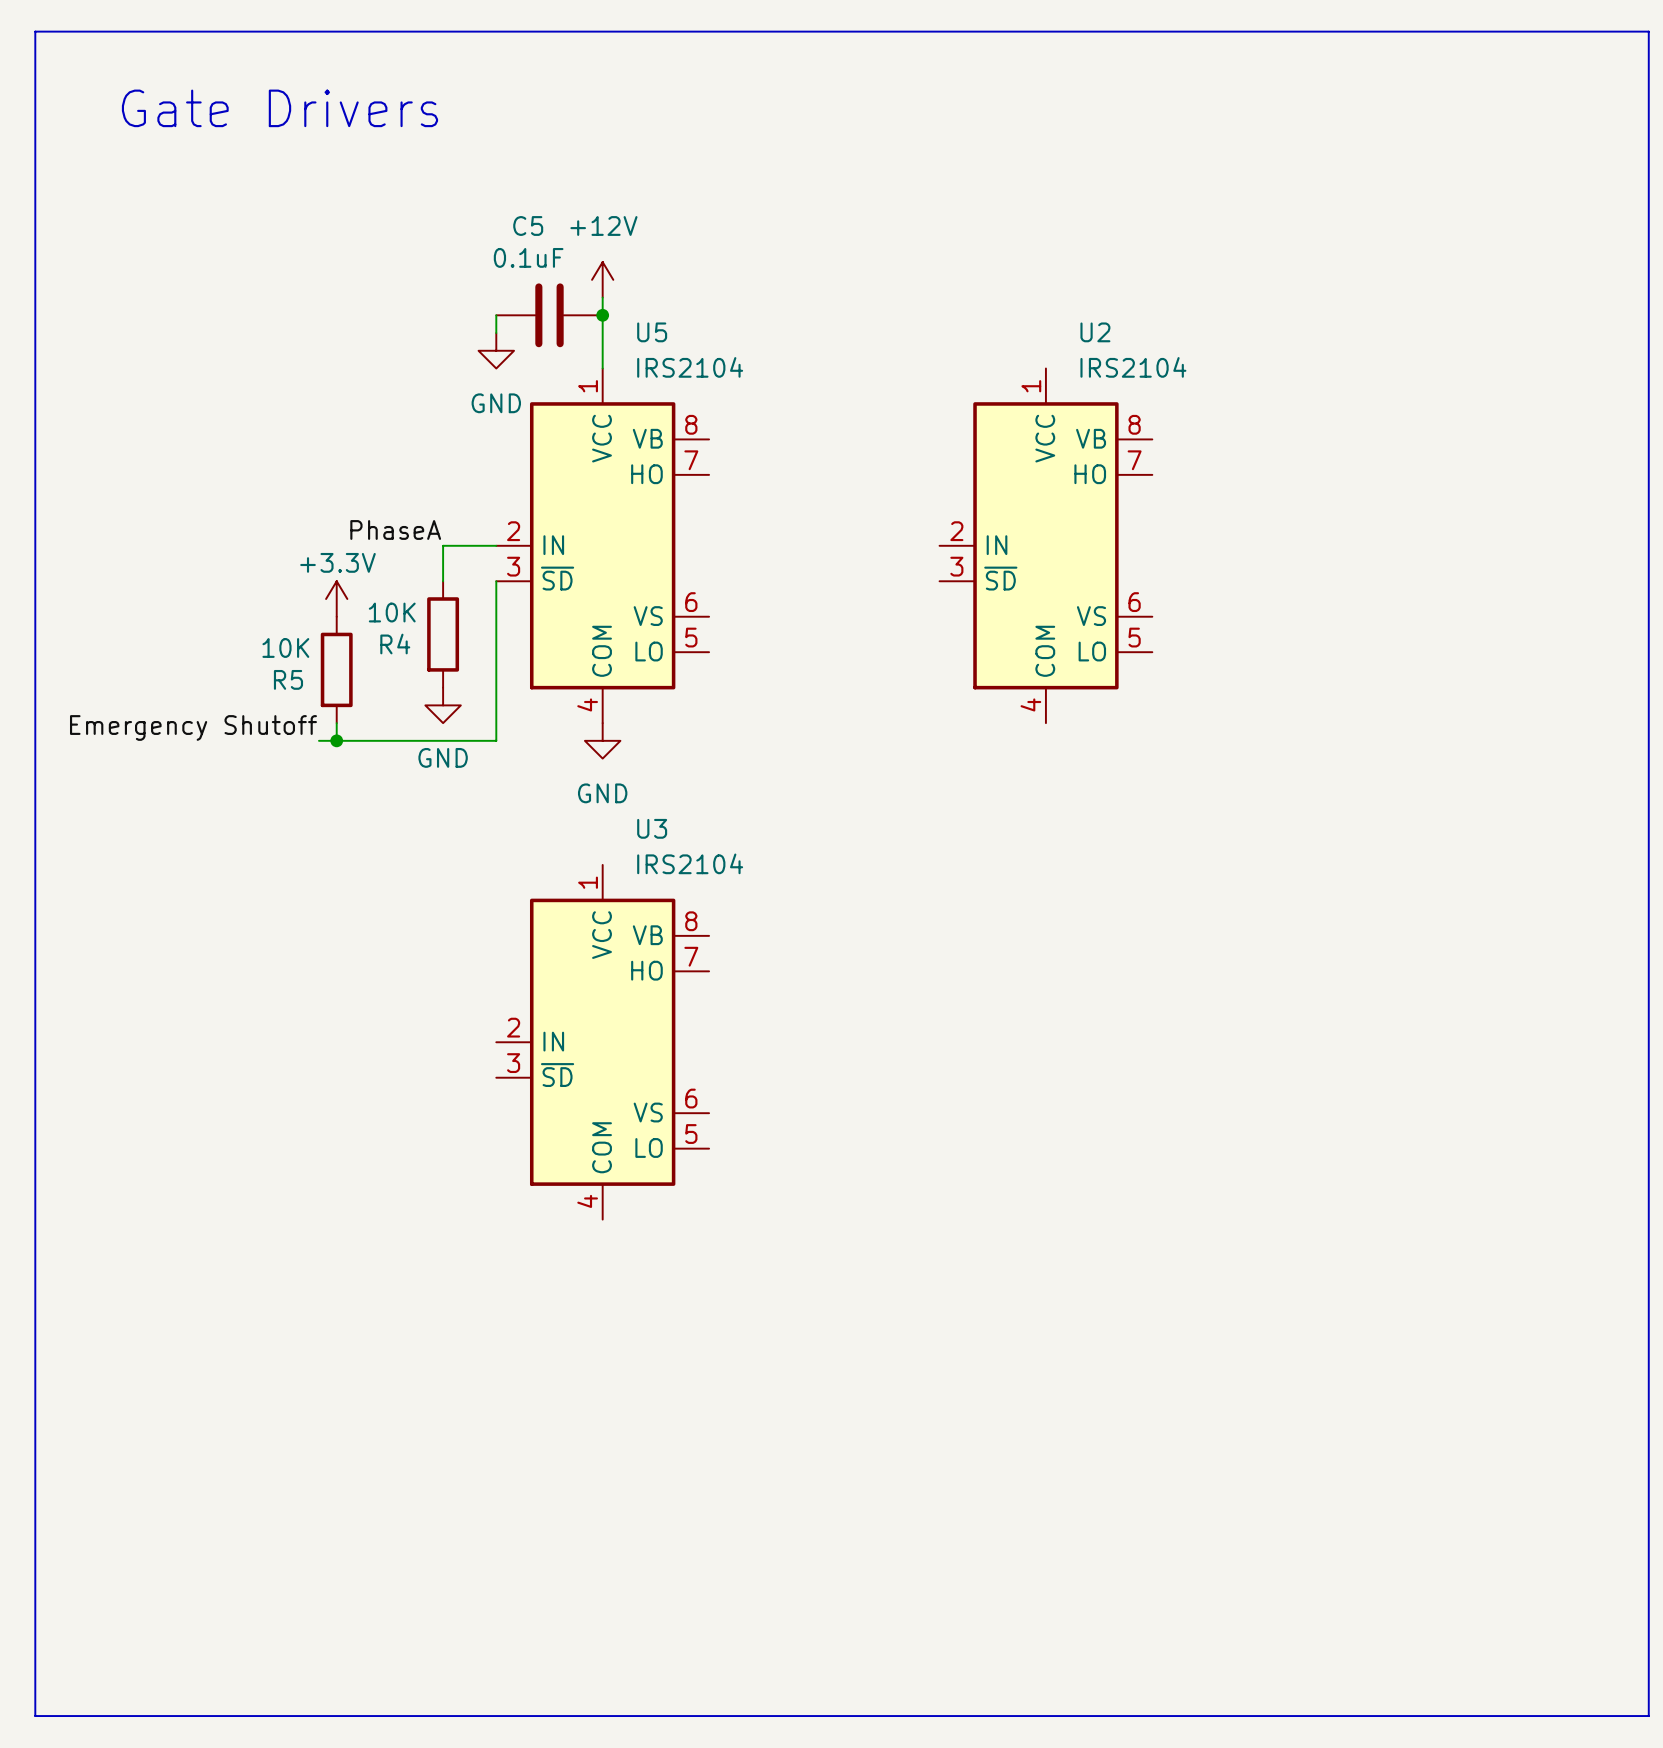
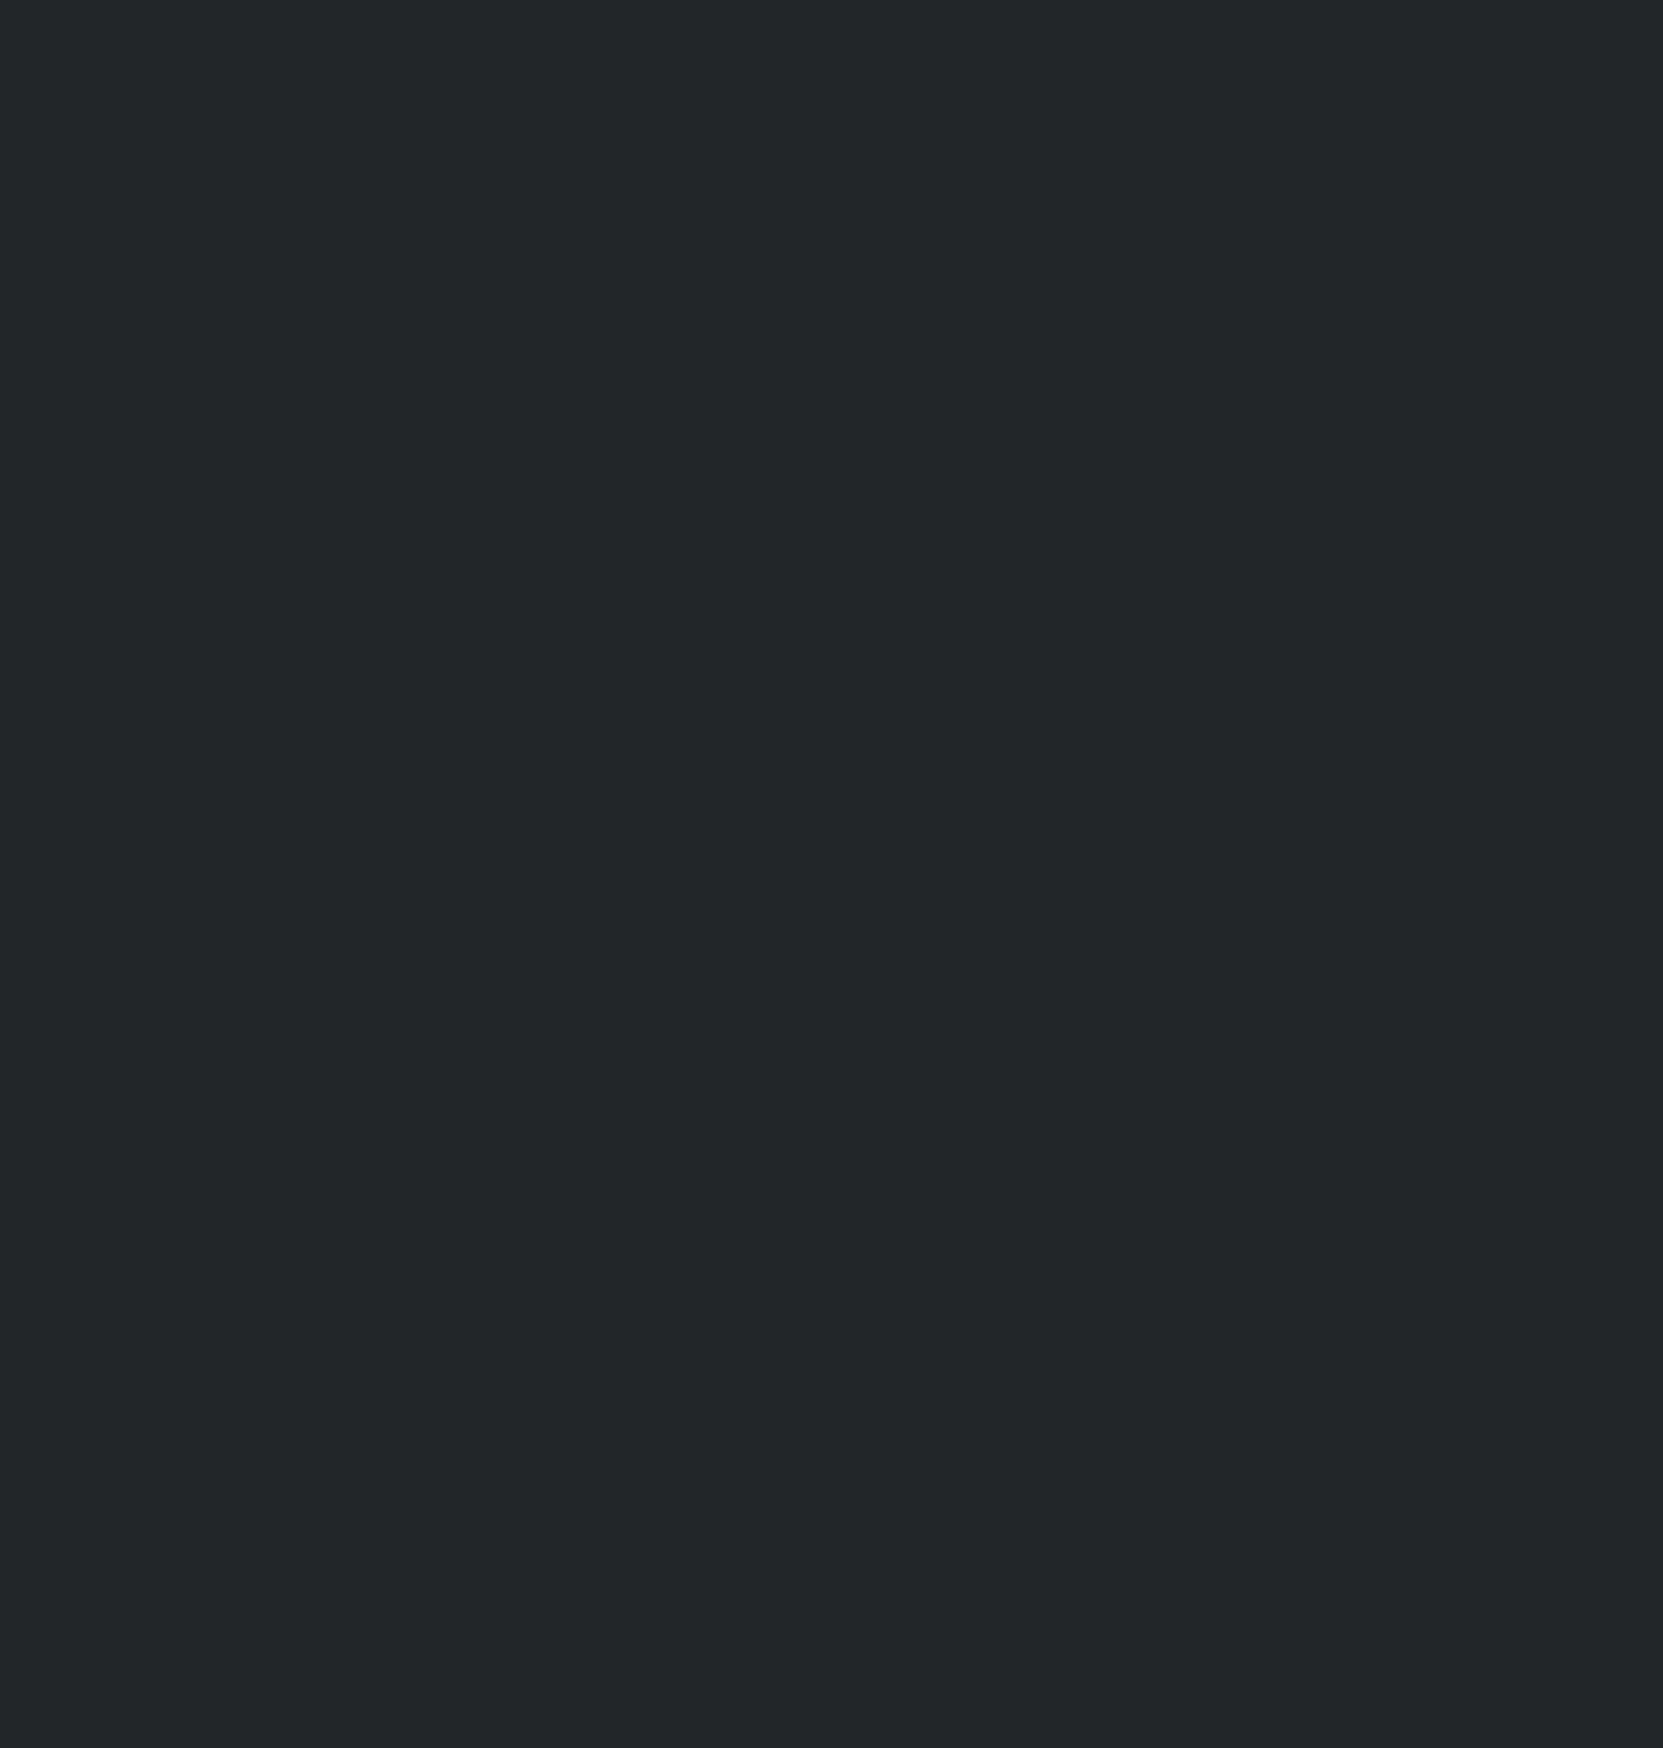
line: (35, 31) (1648, 31) (1648, 1716) (35, 1716) (35, 31) -> none
text: Gate Drivers (279, 108) -> none
power symbol: +12V (602, 279) -> none
wire: (602, 297) (602, 368) -> none
wire: (496, 315) (496, 333) -> none
C5: 0.1uF (549, 315) -> none
junction: (602, 315) -> none
power symbol: GND (496, 350) -> none
label: PhaseA (395, 529) -> none
wire: (496, 545) (443, 545) (443, 581) -> none
U5: IRS2104 (602, 545) -> none
U2: IRS2104 (1045, 545) -> none
wire: (496, 581) (496, 740) (318, 740) -> none
power symbol: +3.3V (336, 599) -> none
R4: 10K (443, 634) -> none
R5: 10K (336, 669) -> none
power symbol: GND (443, 705) -> none
wire: (336, 723) (336, 740) -> none
label: Emergency Shutoff (193, 727) -> none
junction: (336, 740) -> none
power symbol: GND (602, 740) -> none
U3: IRS2104 (602, 1042) -> none

